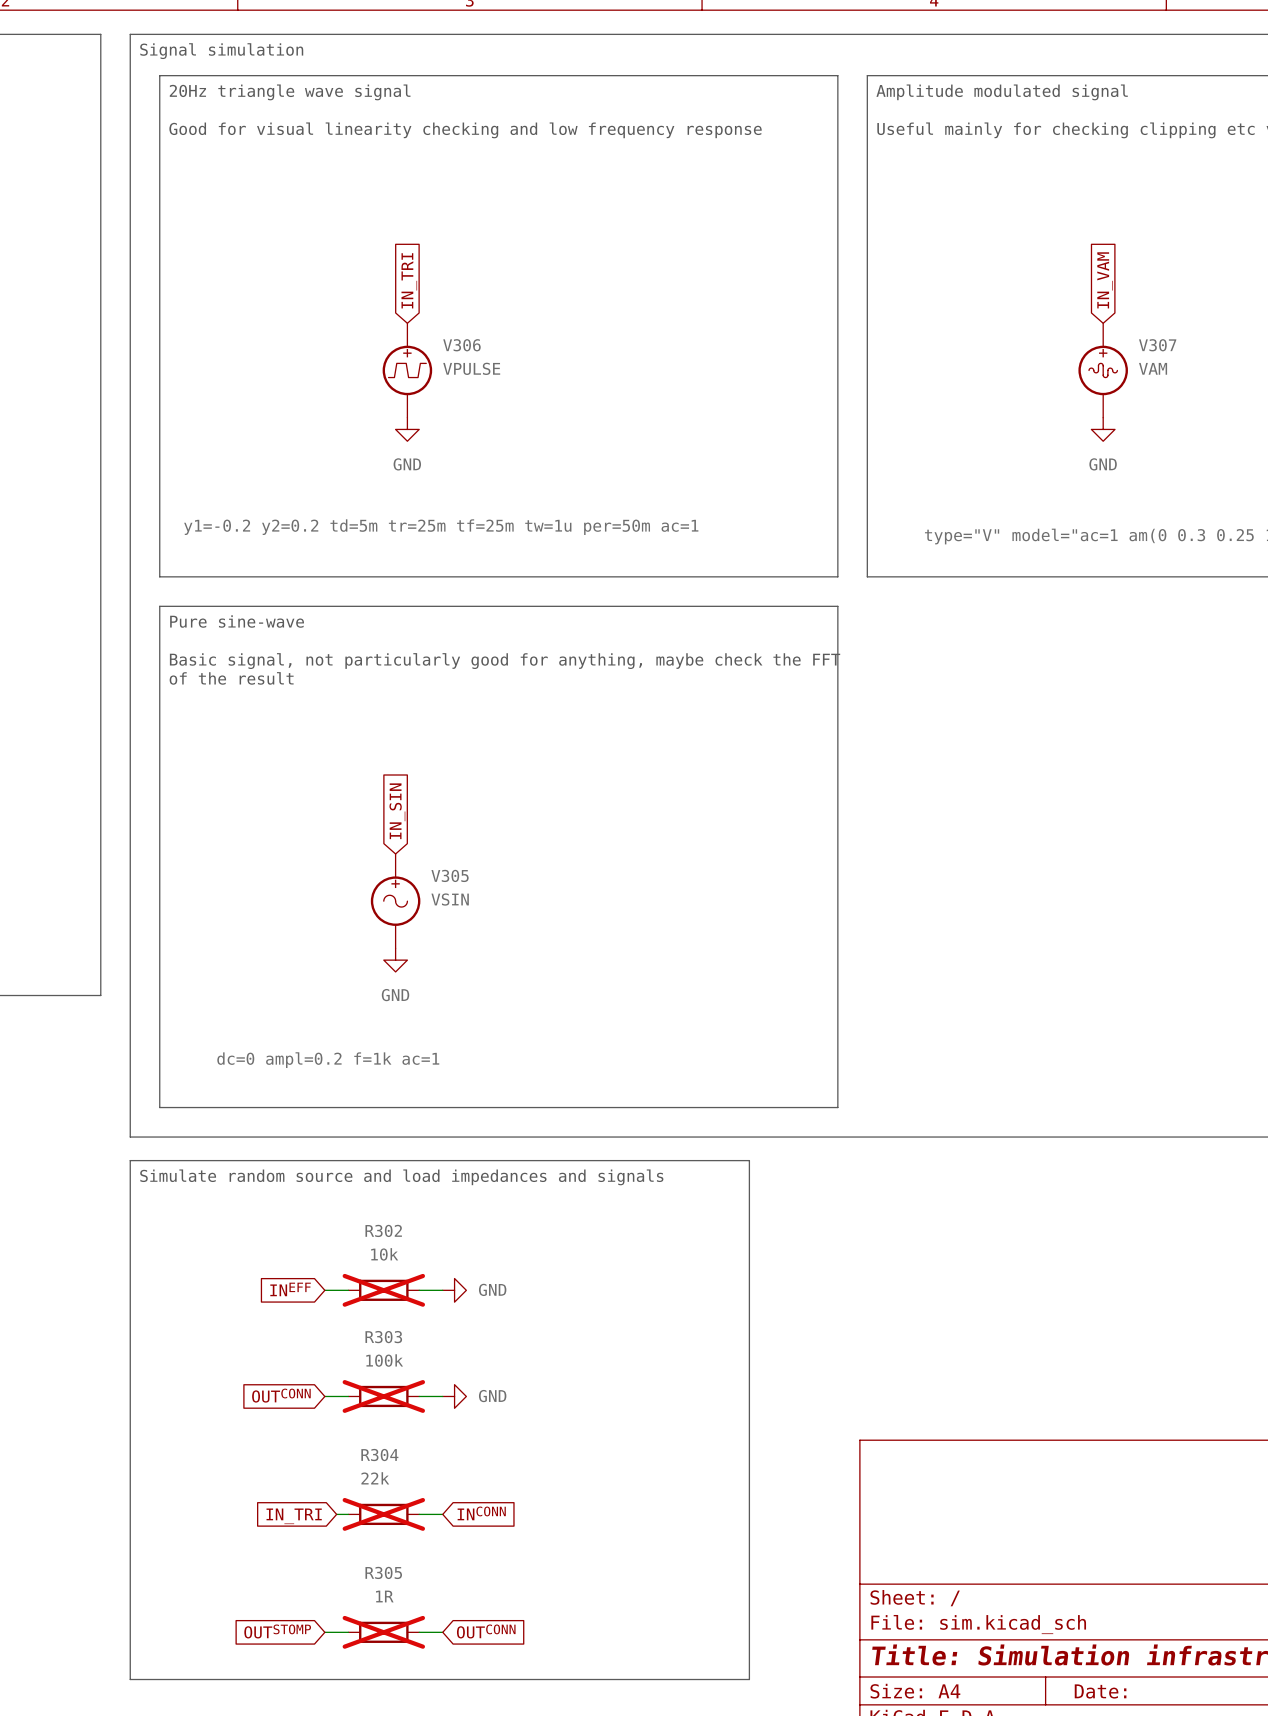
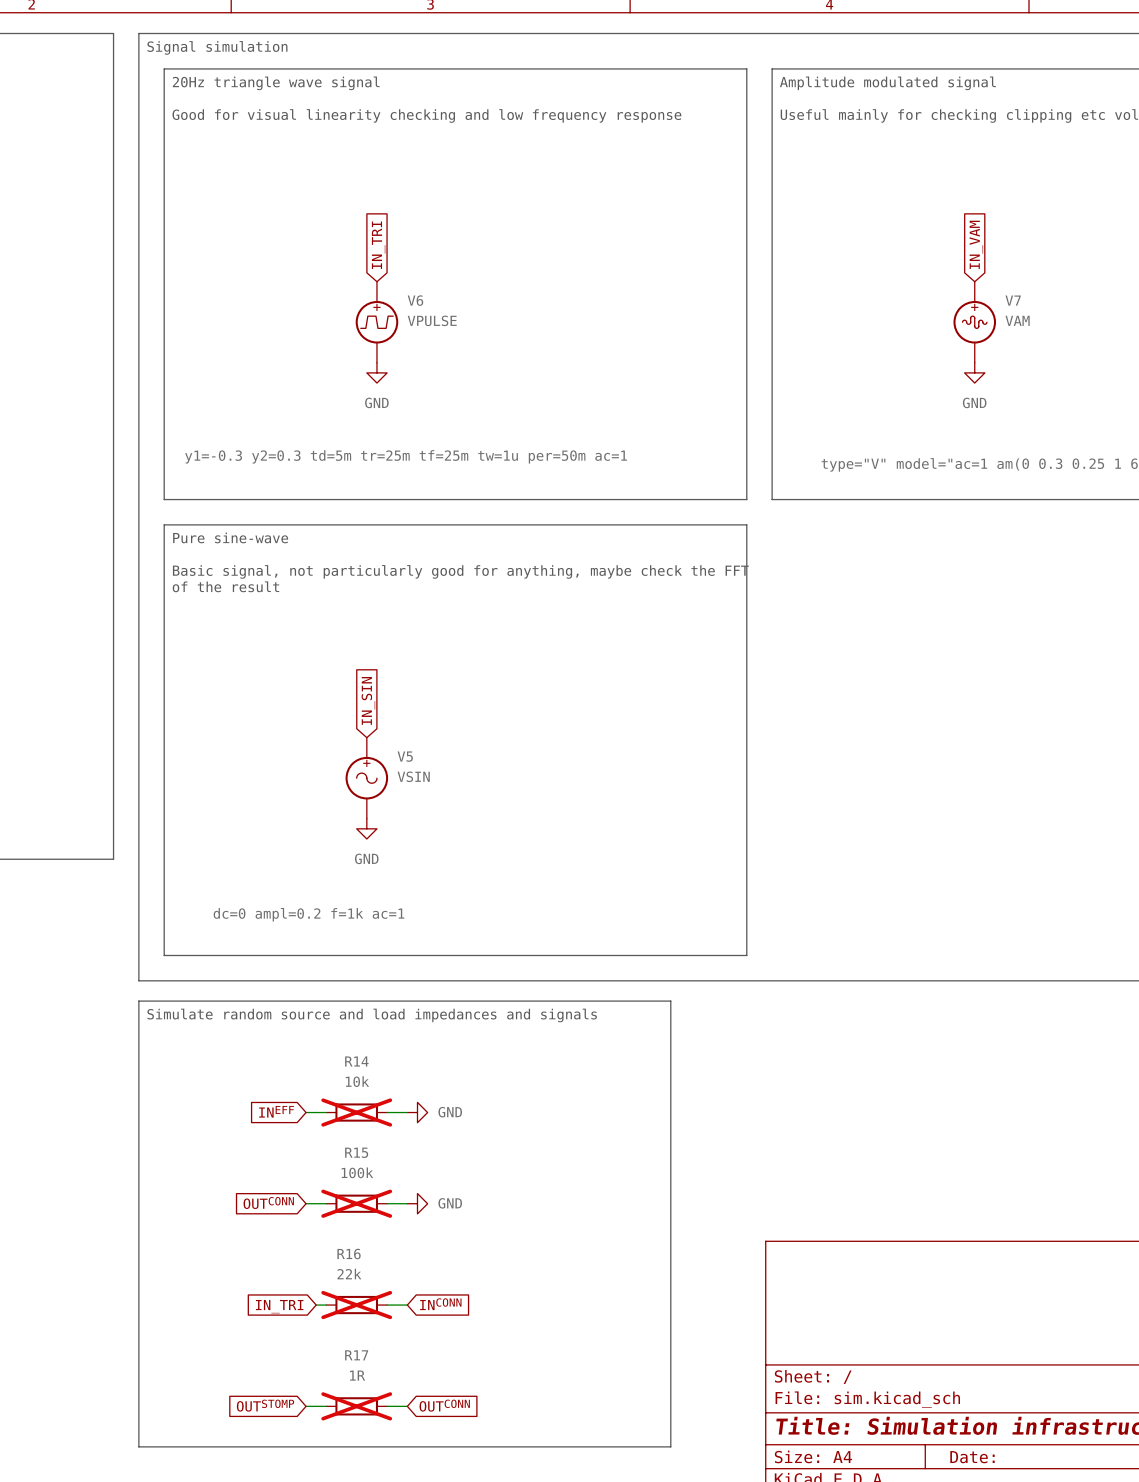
V306 name: V306 (461, 345) -> V6 (415, 300)
V307 name: V307 (1157, 345) -> V7 (1013, 300)
V306 text: y1=-0.2 y2=0.2 td=5m tr=25m tf=25m tw=1u per=50m ac=1 (441, 527) -> y1=-0.3 y2=0.3 td=5m tr=25m tf=25m tw=1u per=50m ac=1 (406, 456)
V305 name: V305 (450, 875) -> V5 (405, 756)
R302 name: R302 (383, 1230) -> R14 (356, 1061)
R303 name: R303 (383, 1337) -> R15 (356, 1152)
R304 name: R304 (379, 1455) -> R16 (349, 1254)
R305 name: R305 (383, 1572) -> R17 (356, 1355)

